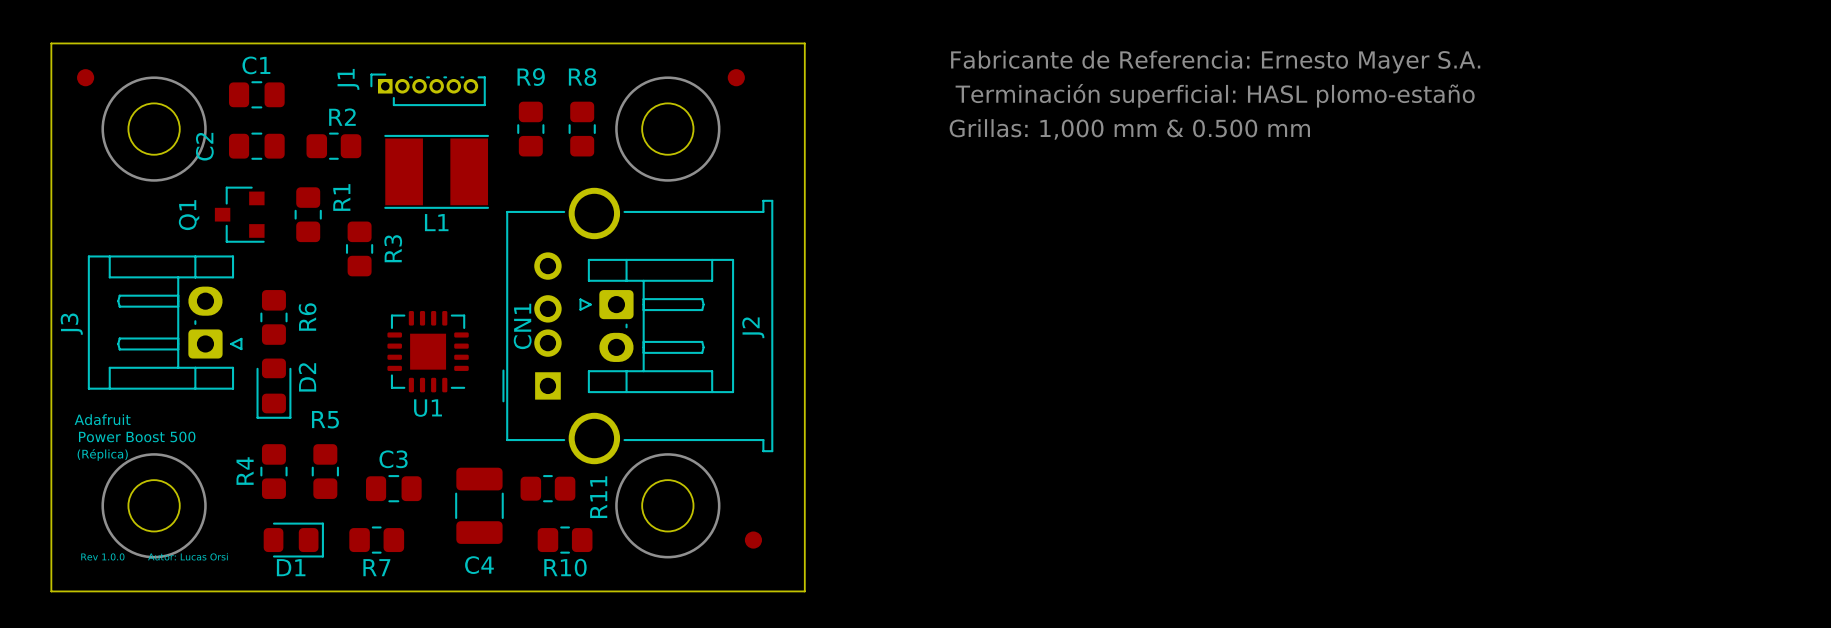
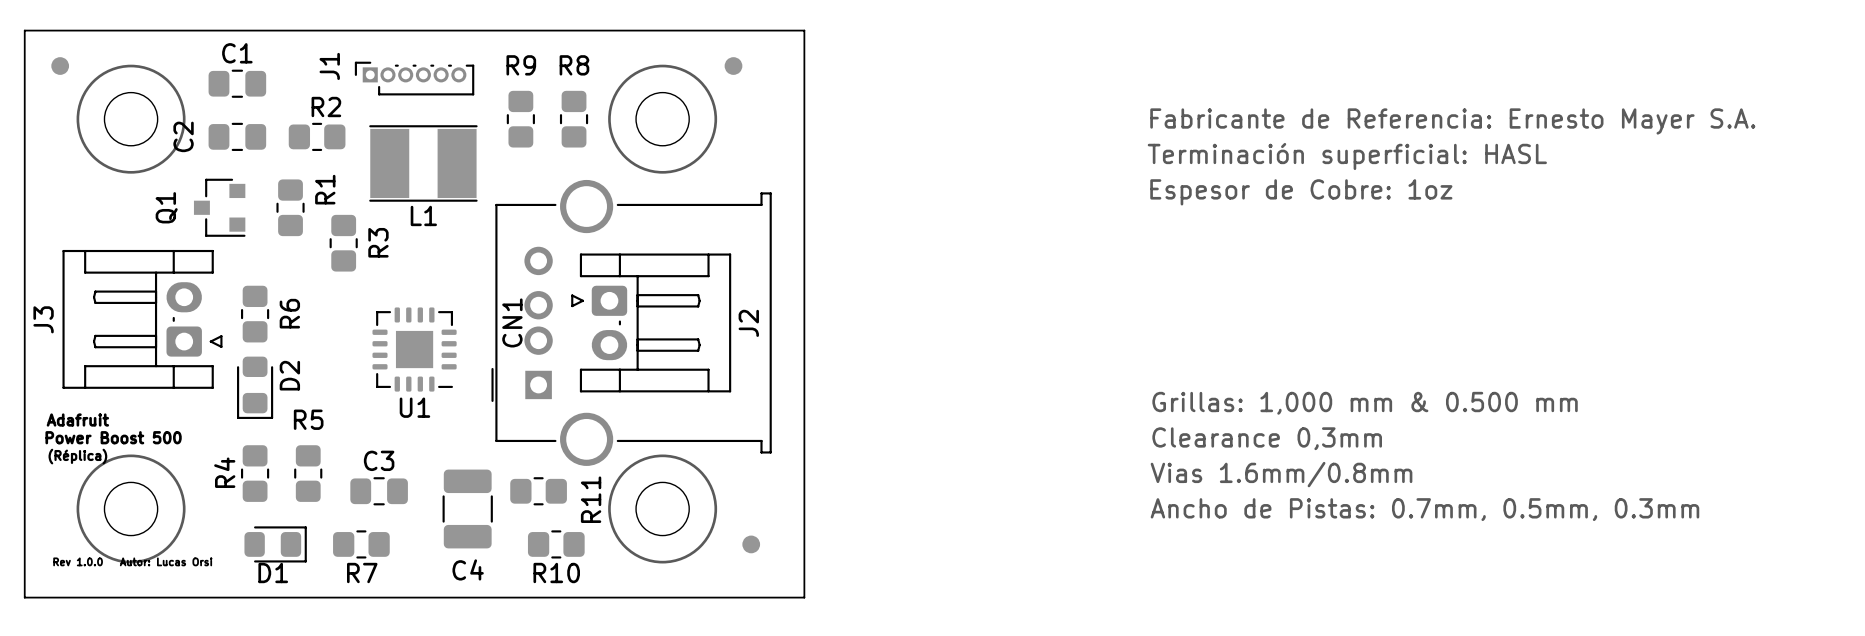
text position: Fabricante de Referencia: Ernesto Mayer S.A. (1215, 62) -> Fabricante de Referencia: Ernesto Mayer S.A. (1452, 121)
text: Terminación superficial: HASL plomo-estaño (1215, 95) -> none
text position: Grillas: 1,000 mm & 0.500 mm (1129, 129) -> Grillas: 1,000 mm & 0.500 mm (1365, 403)
text: none -> Terminación superficial: HASL (1347, 156)
text: none -> Espesor de Cobre: 1oz (1301, 192)
text: none -> Clearance 0,3mm (1267, 438)
text: none -> Vias 1.6mm/0.8mm (1281, 474)
text: none -> Ancho de Pistas: 0.7mm, 0.5mm, 0.3mm (1424, 509)

